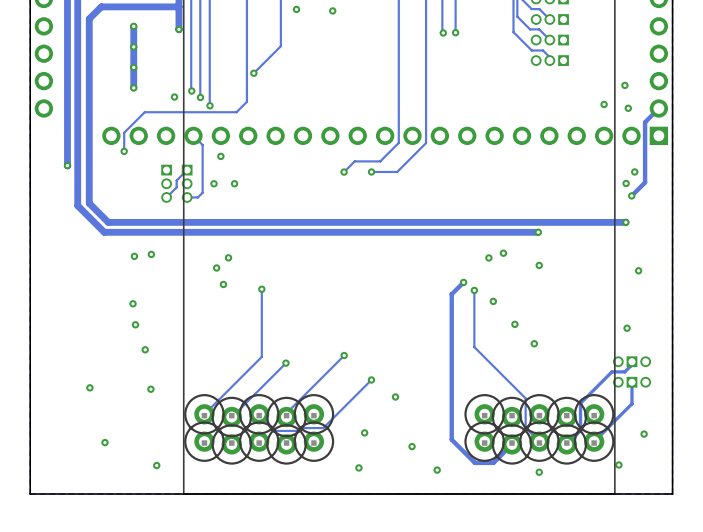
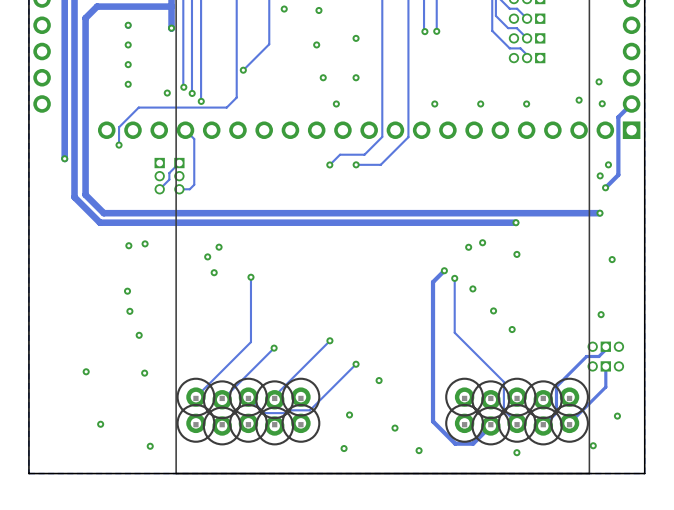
track: (133, 26) (133, 87) -> none
via: none -> (356, 38)
via: none -> (316, 44)
via: none -> (323, 77)
via: none -> (356, 77)
via: none -> (336, 103)
via: none -> (434, 103)
via: none -> (480, 103)
via: none -> (526, 103)
via: (220, 156) -> none
via: (214, 183) -> none
via: (234, 183) -> none

